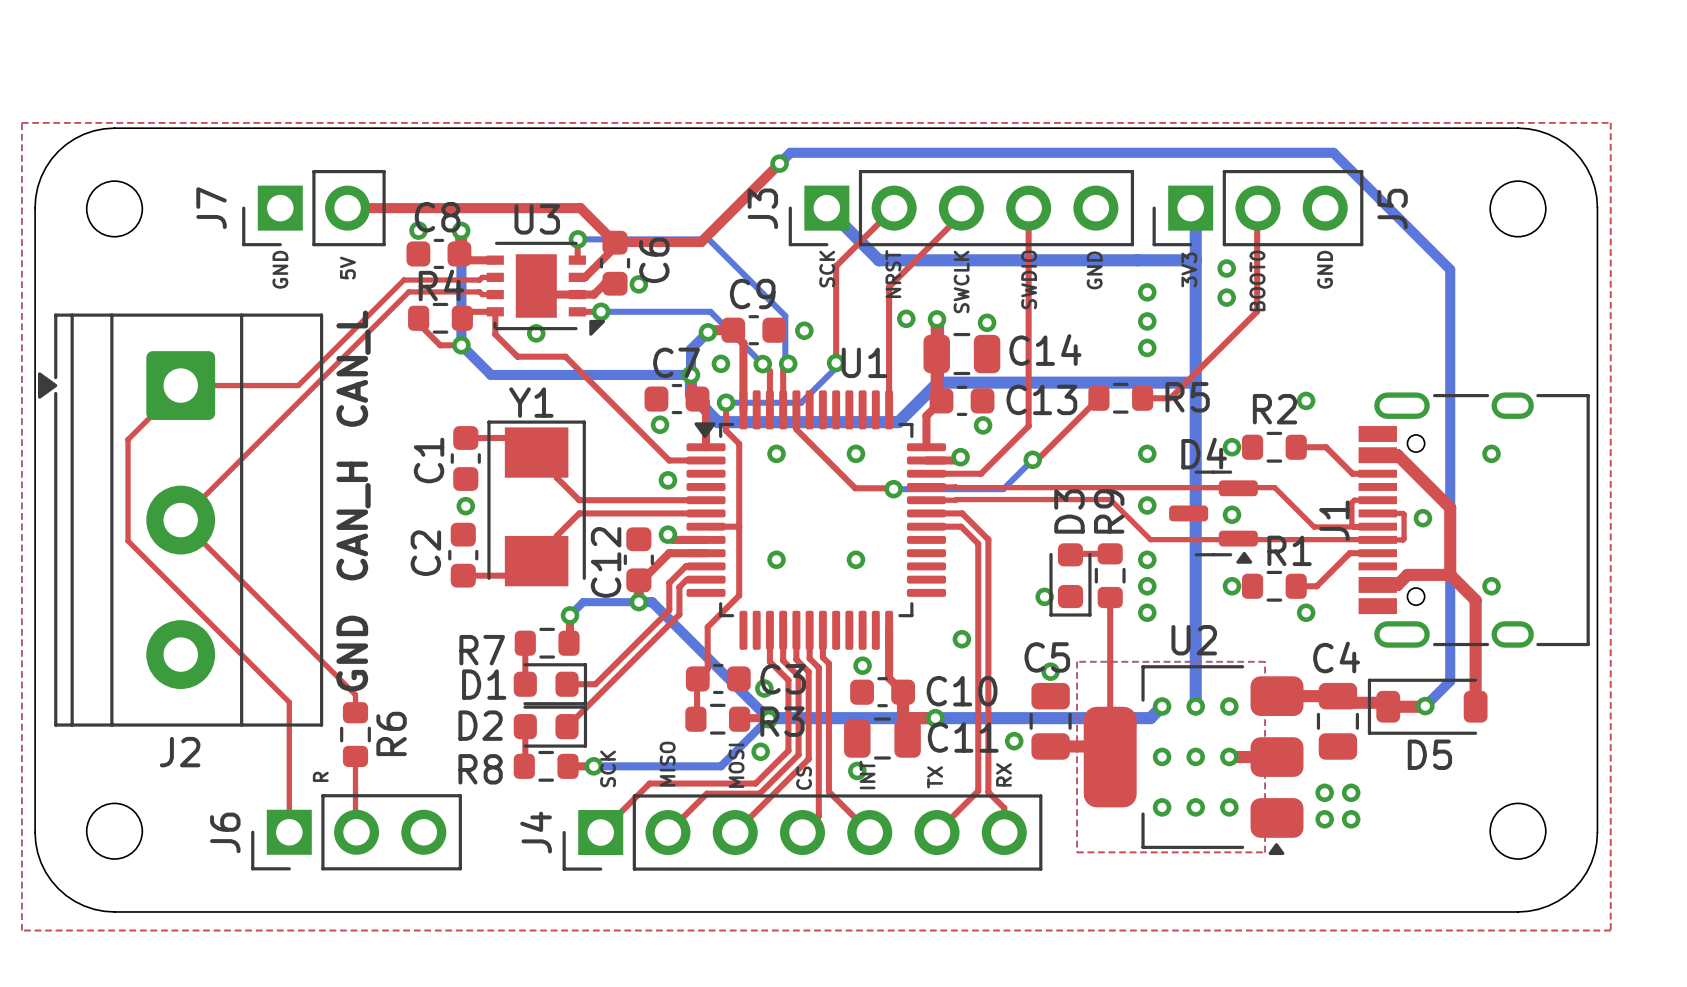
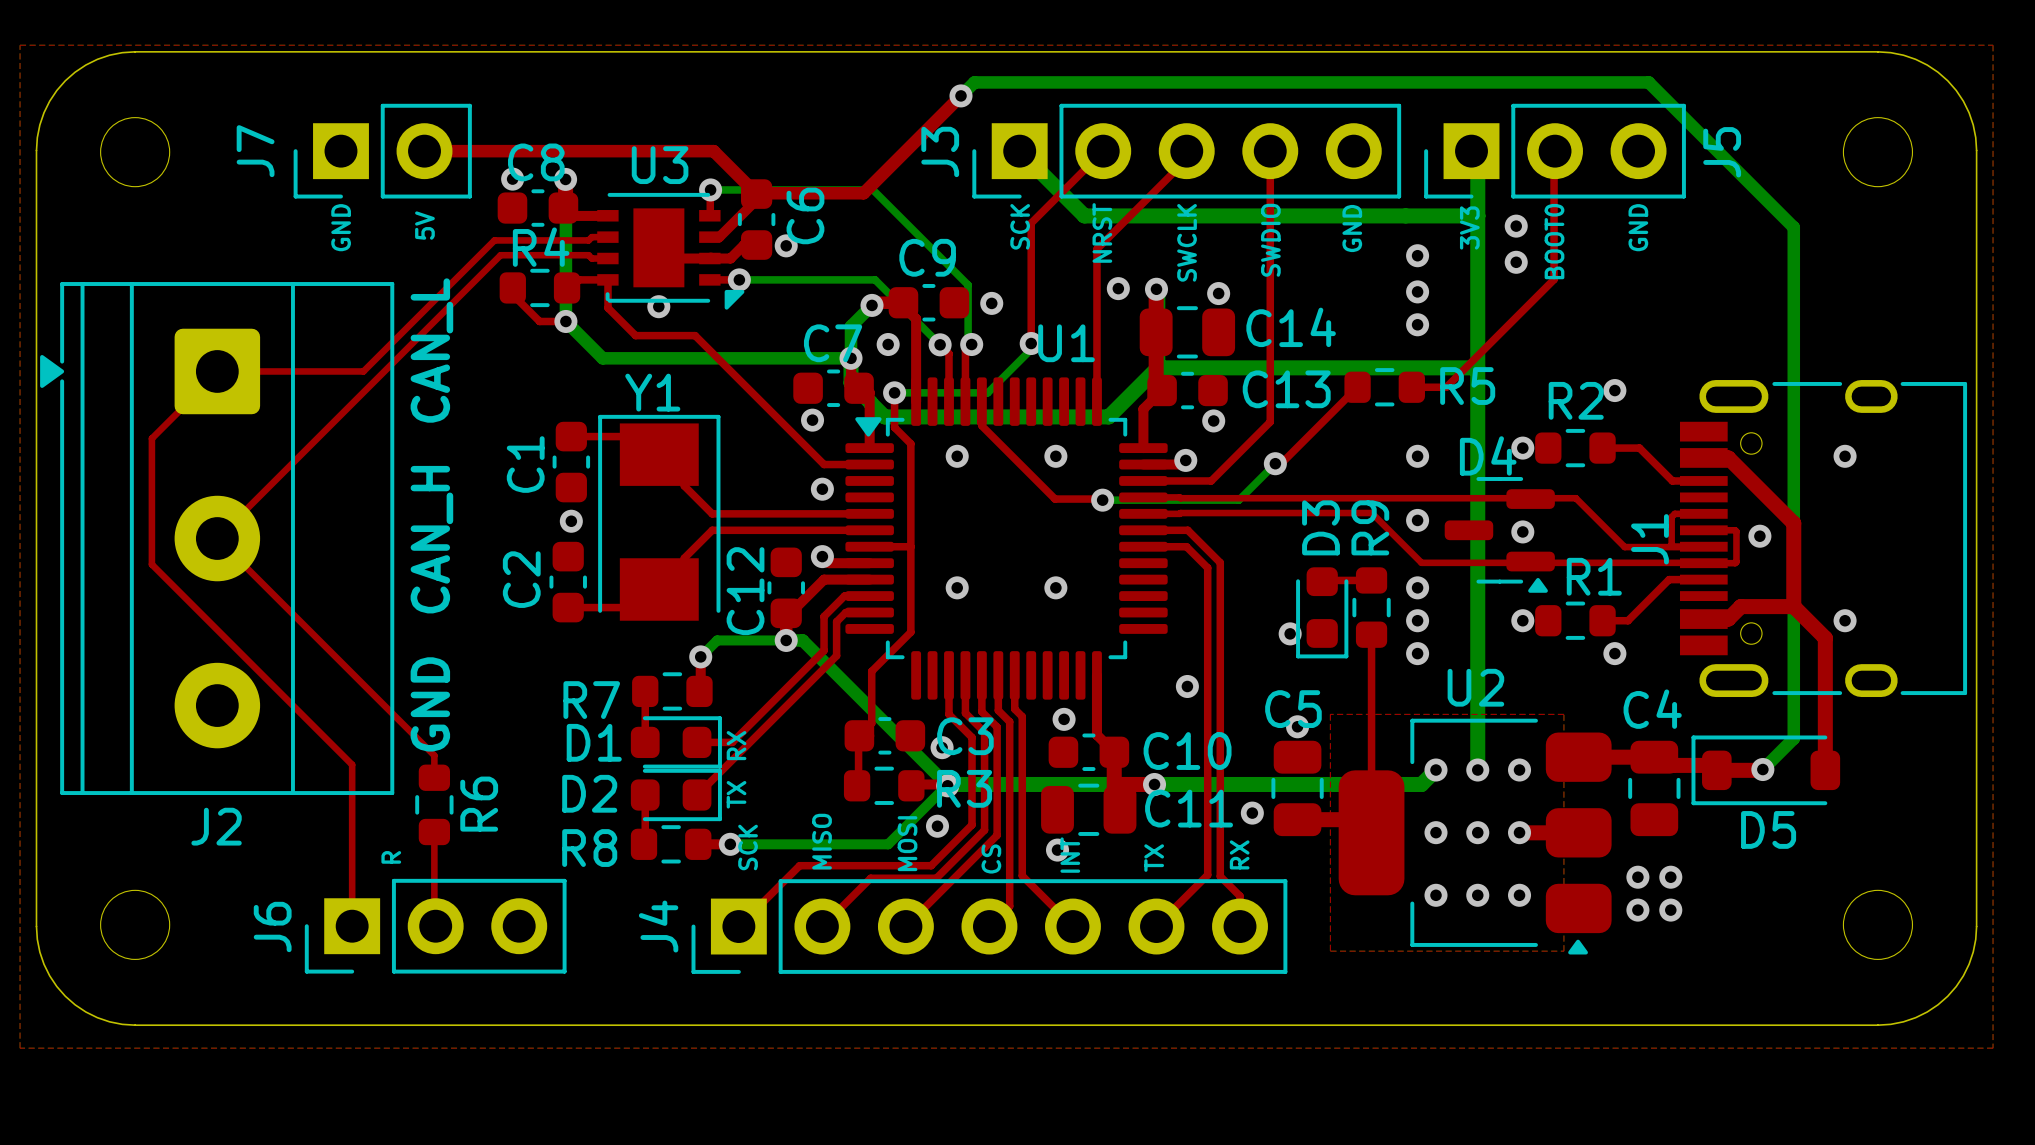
text: none -> RX (736, 745)
text: none -> TX (736, 794)

